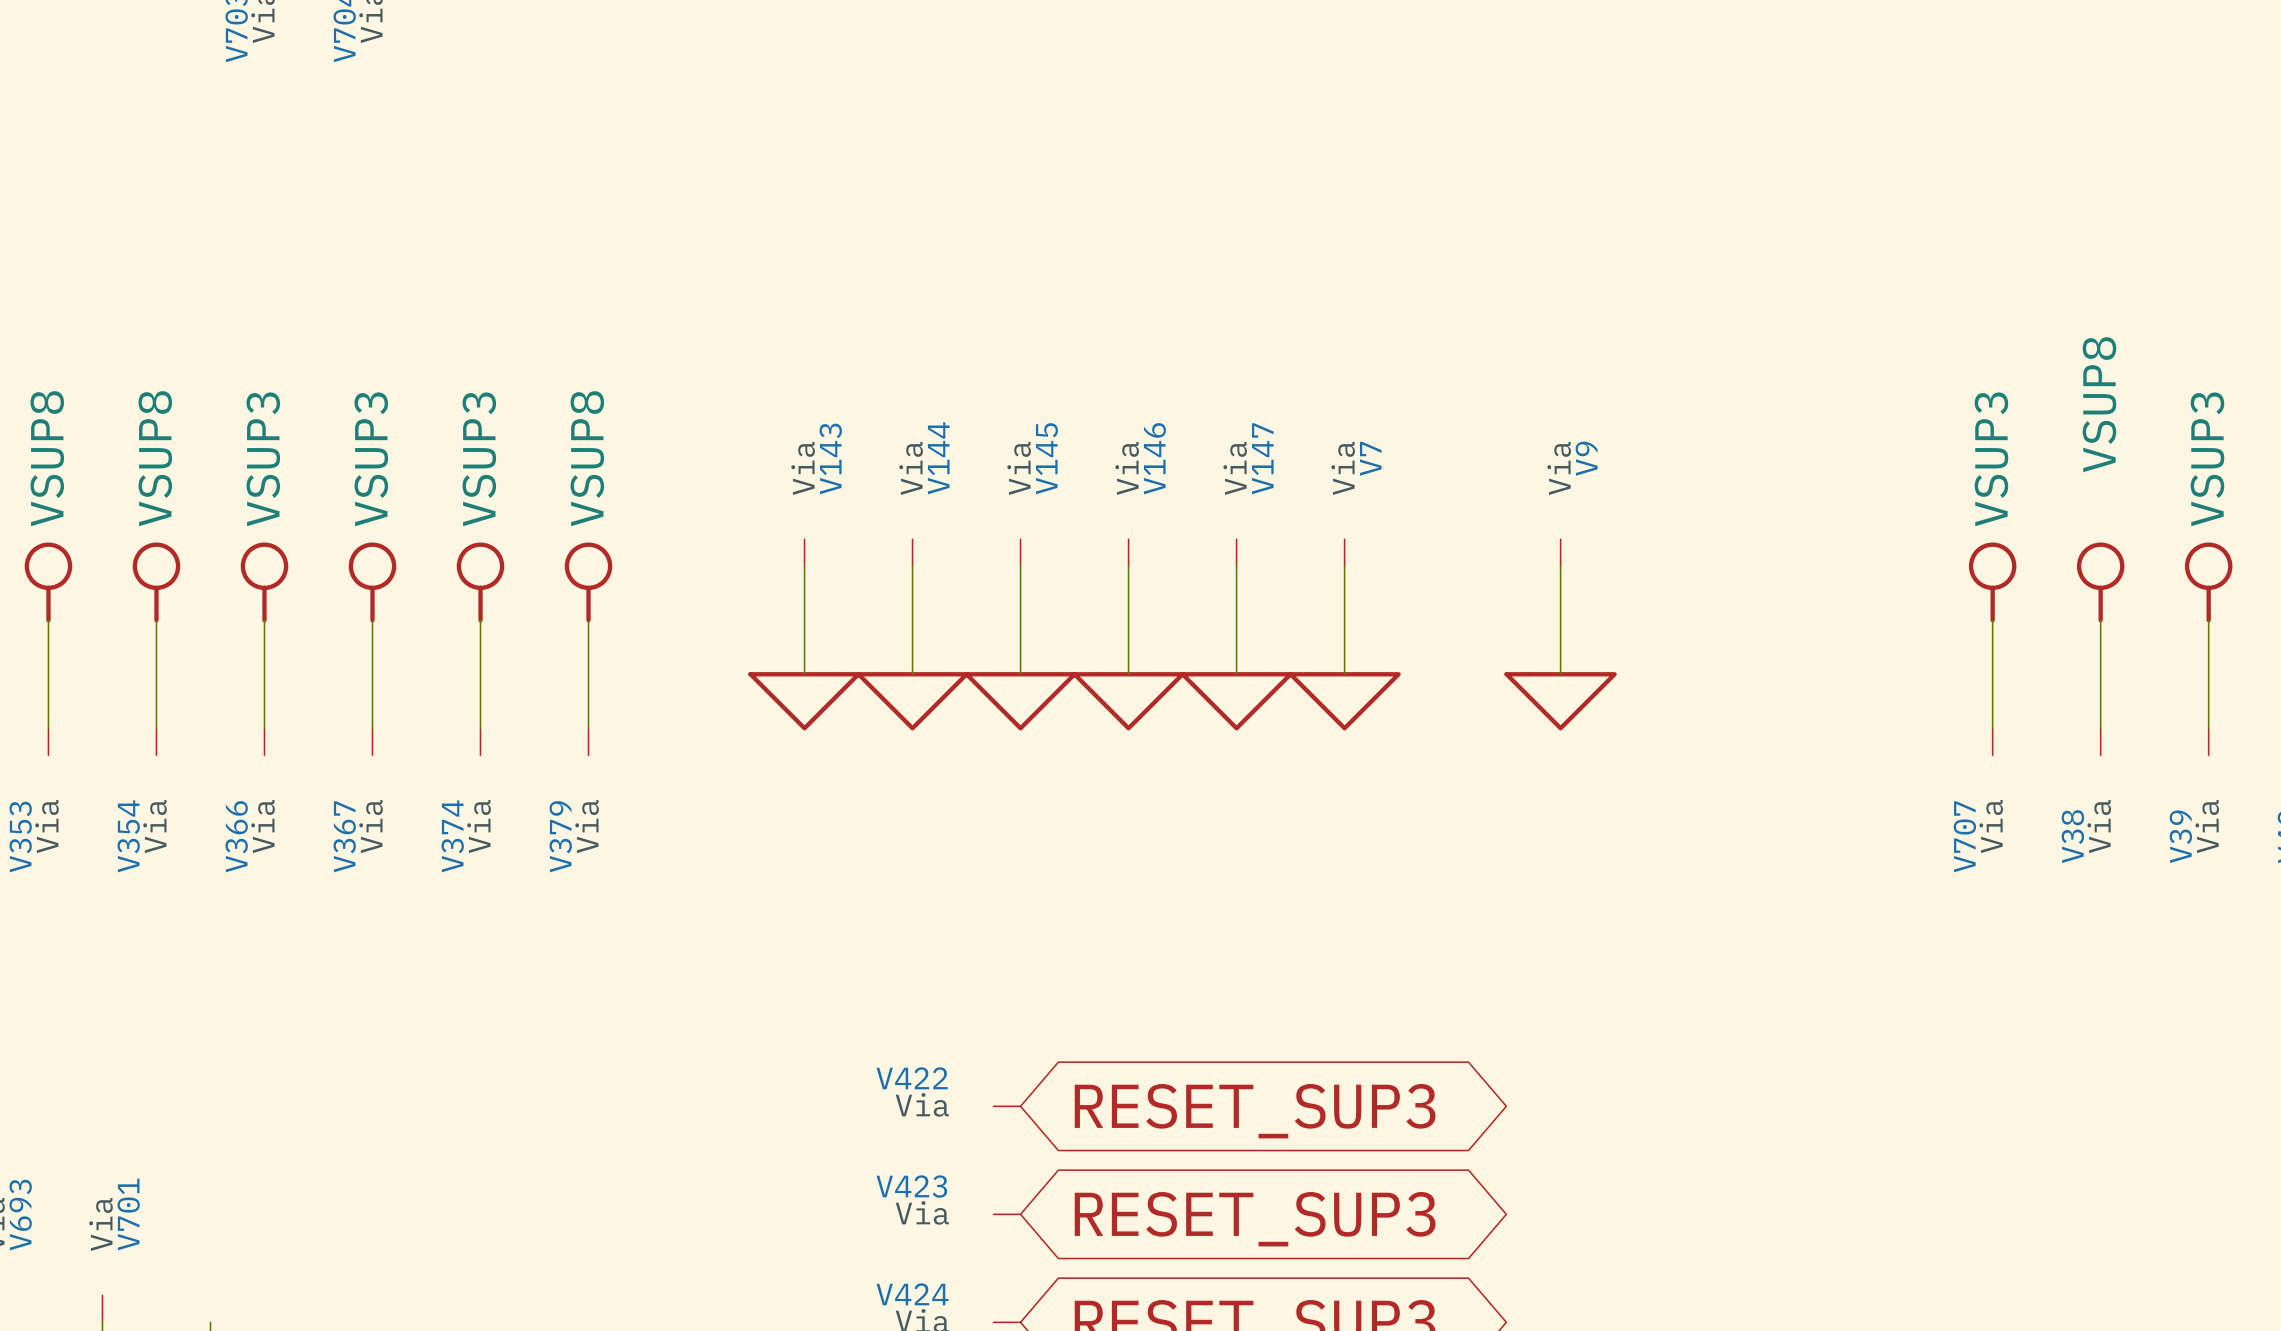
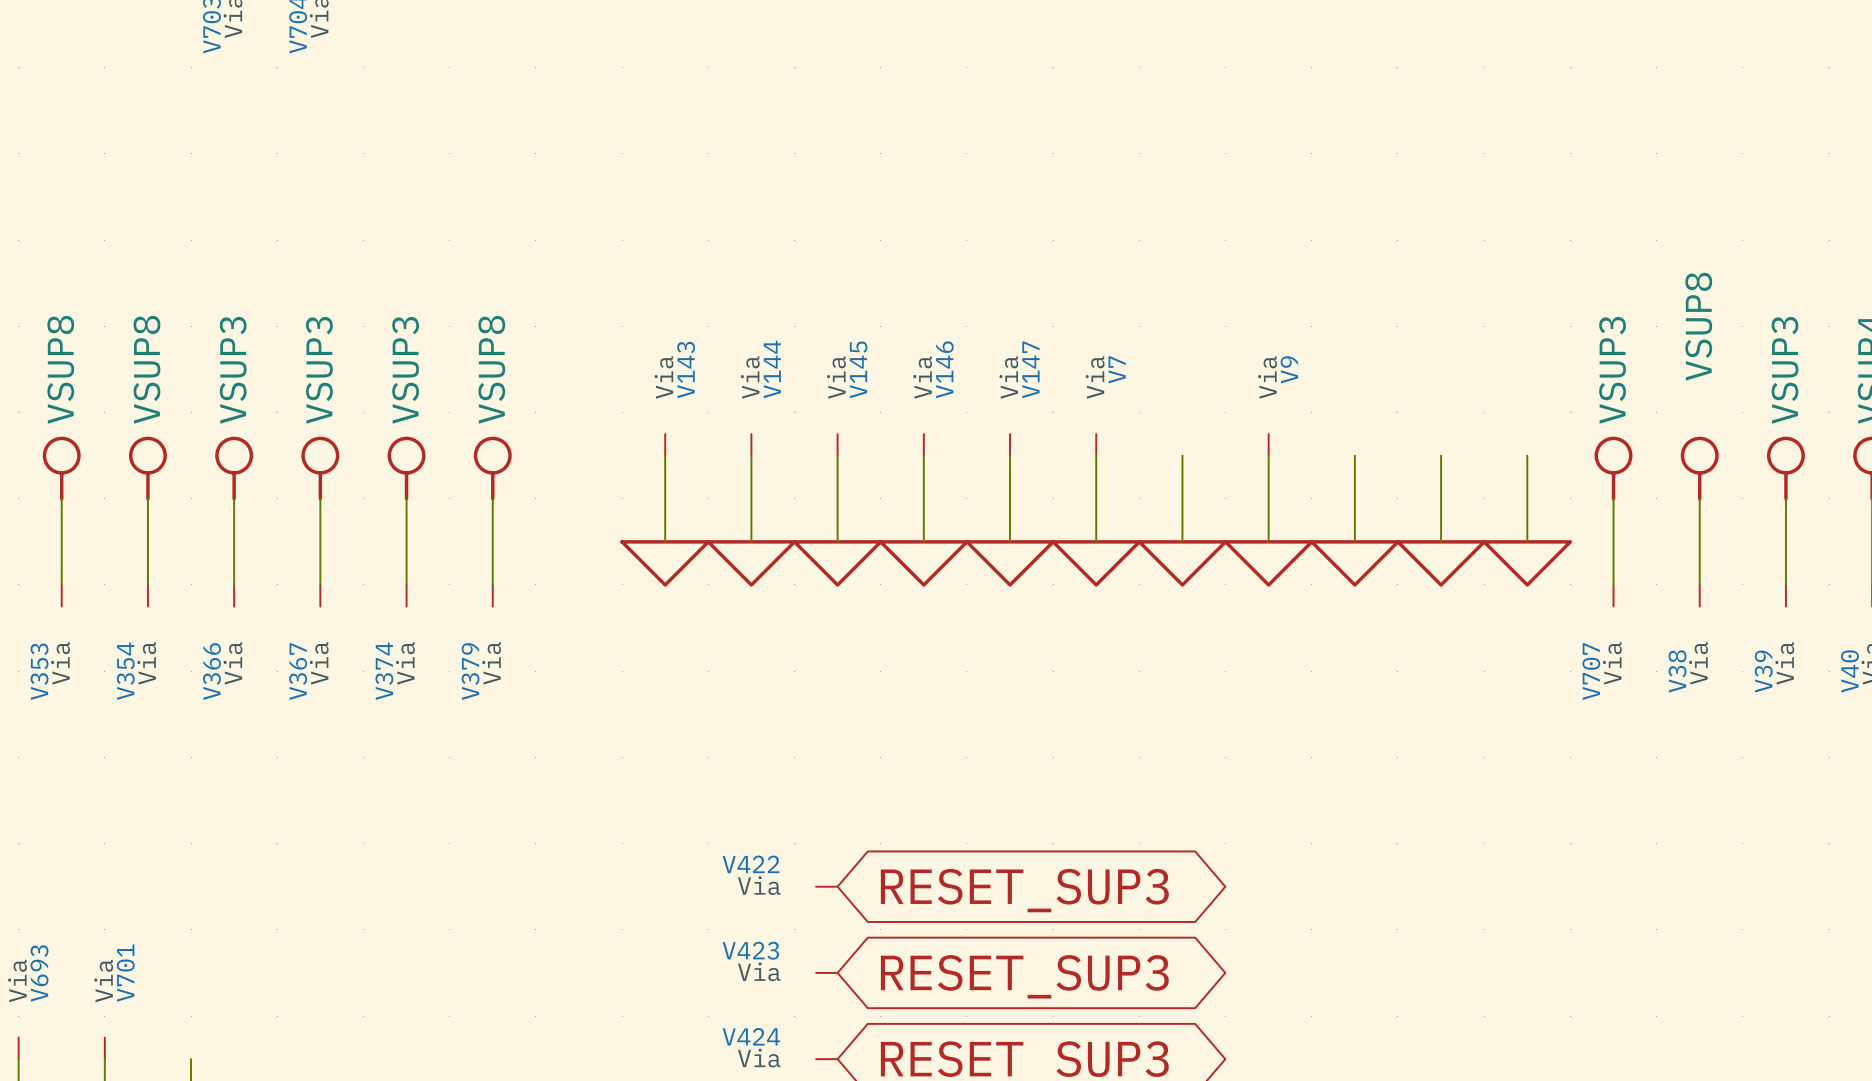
wire: none -> (1182, 455) (1182, 541)
wire: none -> (1354, 455) (1354, 541)
wire: none -> (1441, 455) (1441, 541)
wire: none -> (1527, 455) (1527, 541)
power symbol: none -> (1182, 563)
power symbol: none -> (1354, 563)
power symbol: none -> (1441, 563)
power symbol: none -> (1527, 563)

